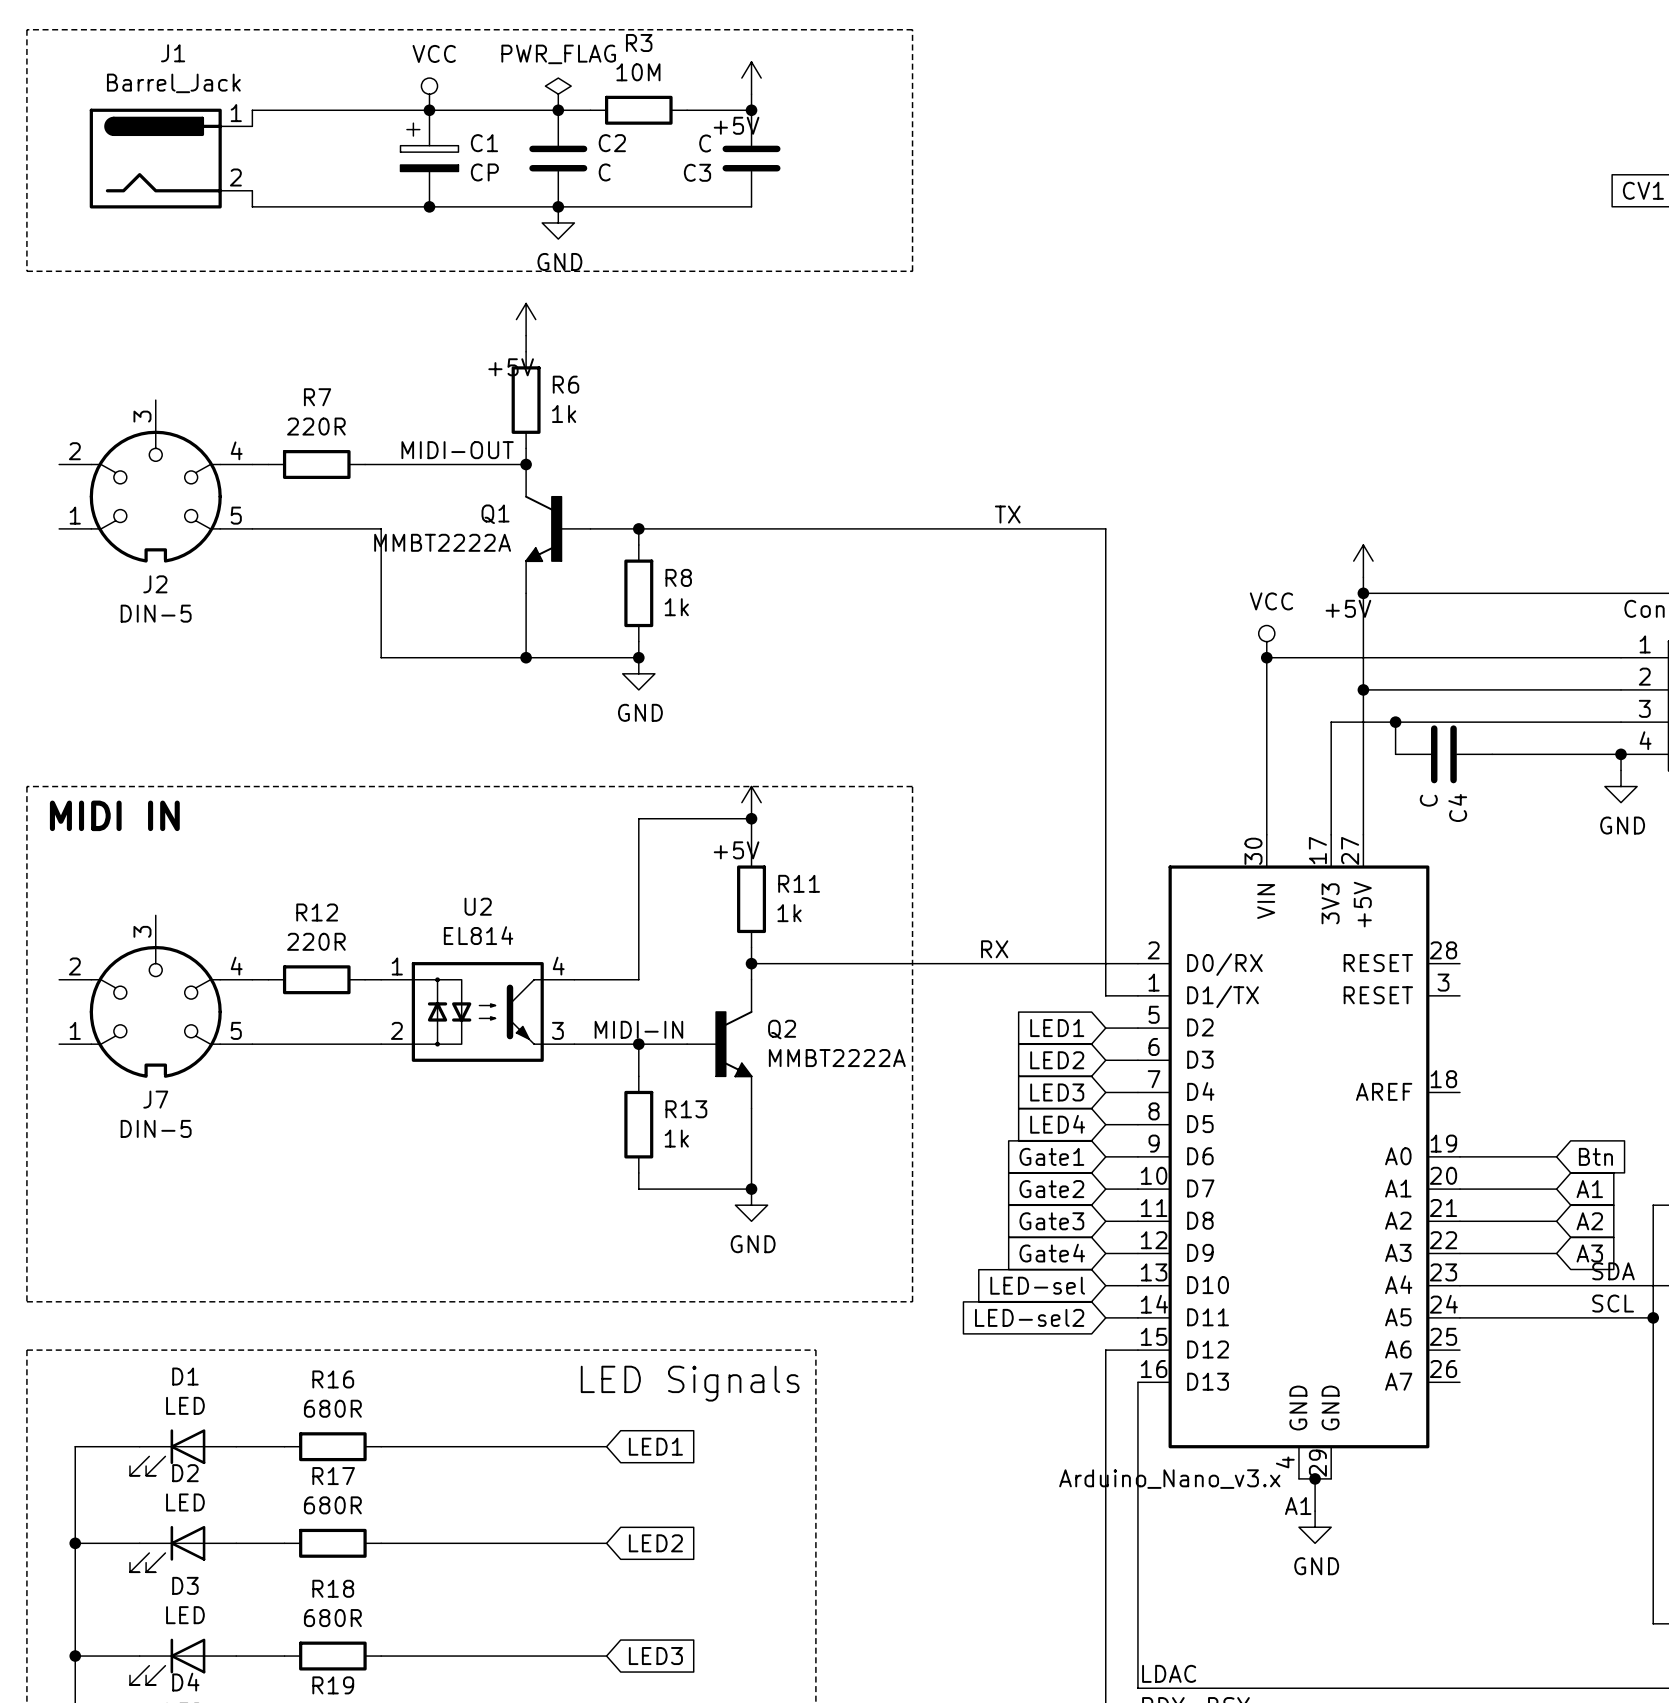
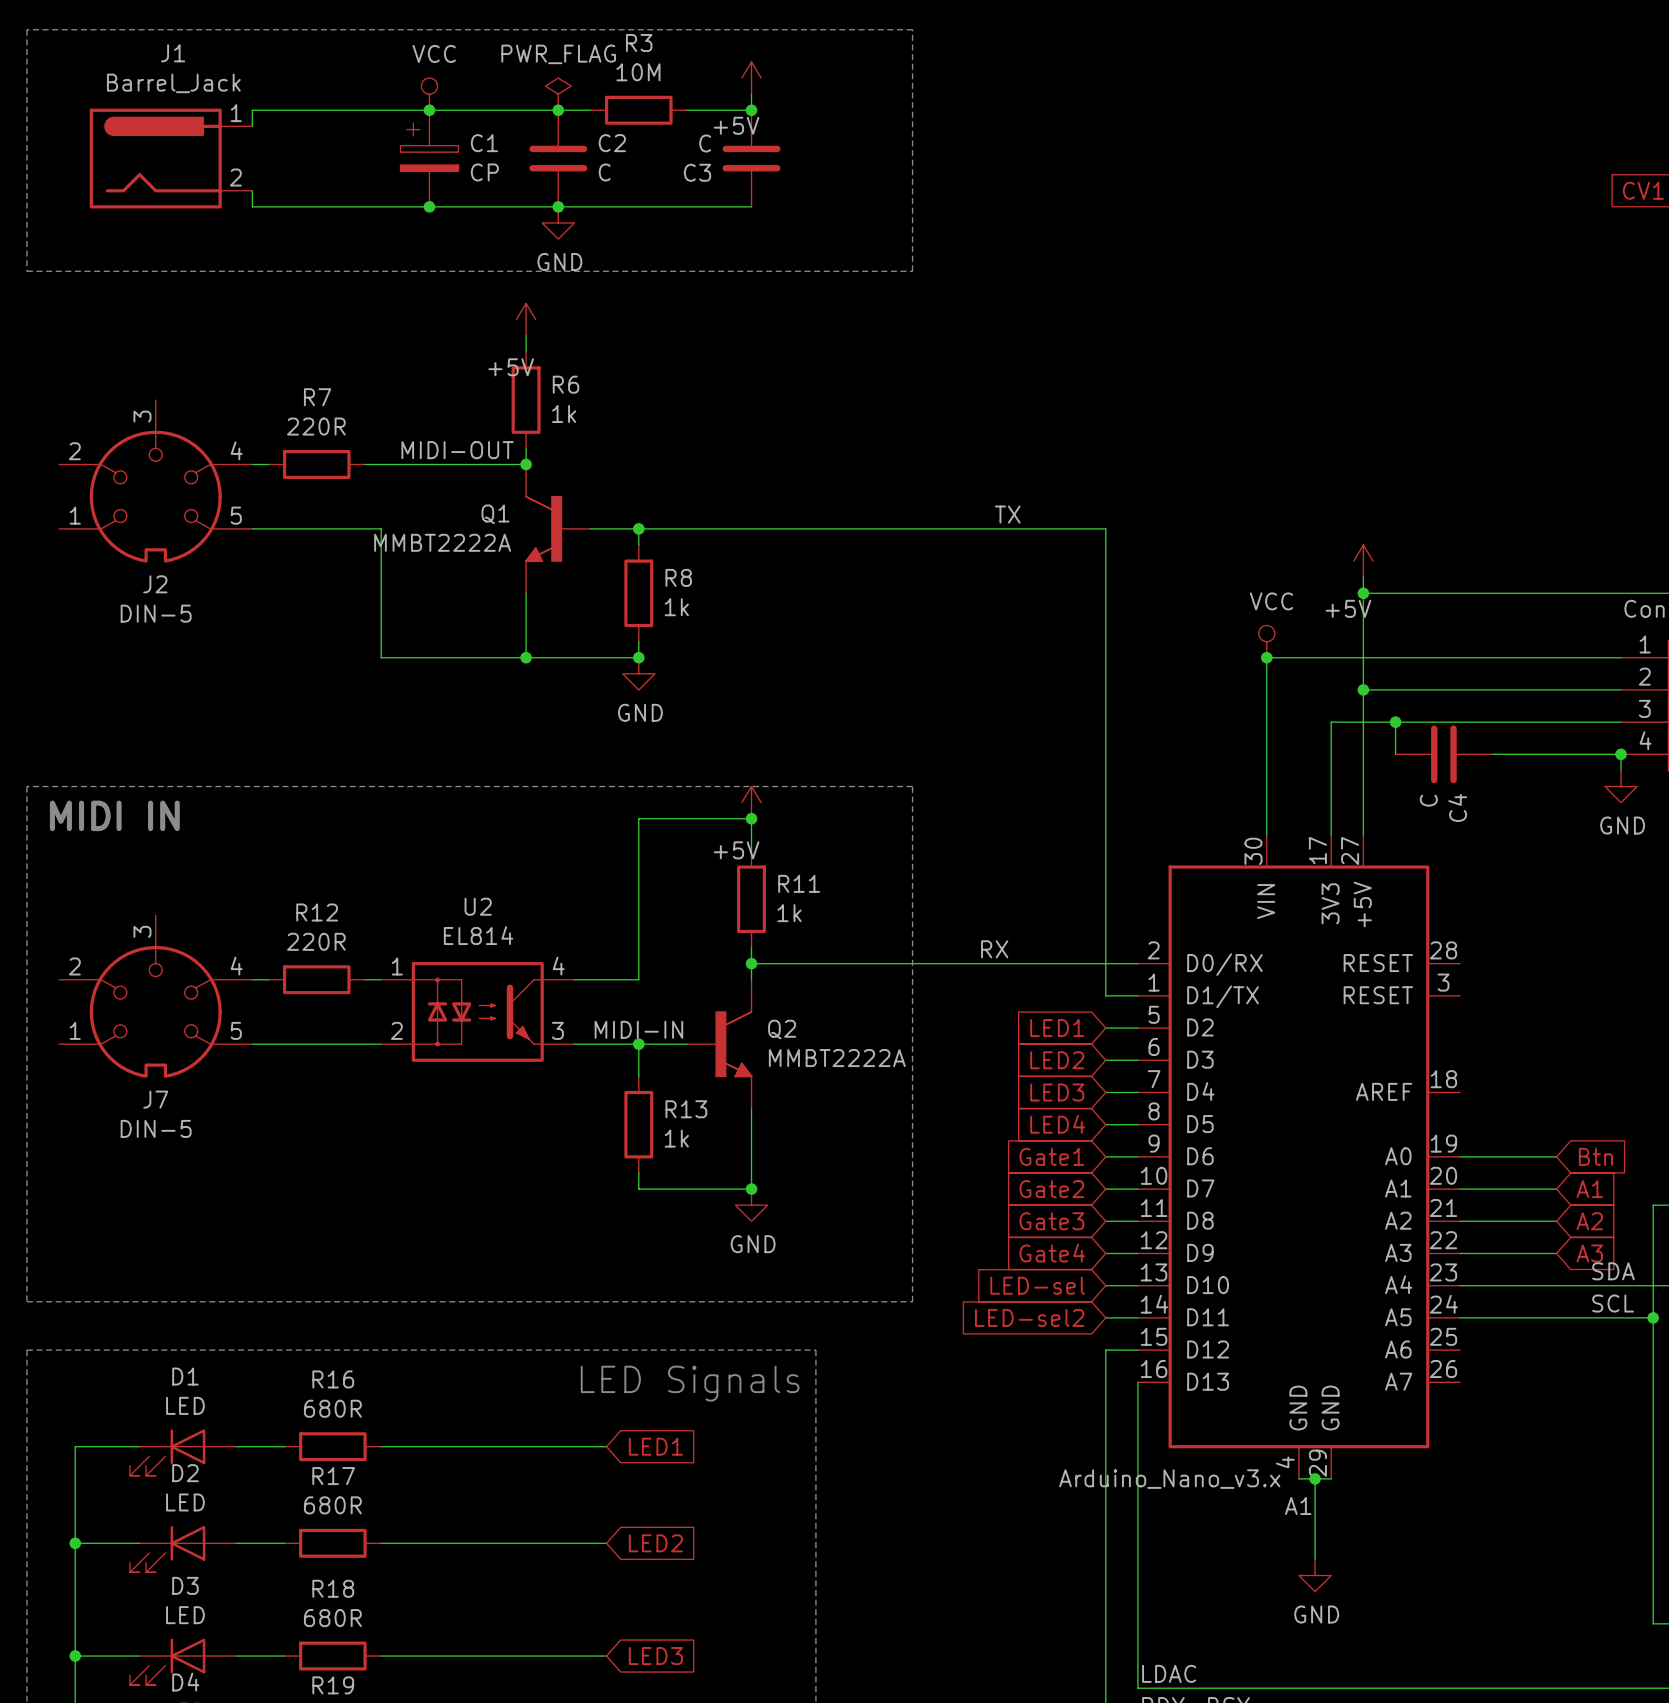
wire: none -> (1315, 1511) (1315, 1559)
power symbol position: GND (1315, 1527) -> GND (1315, 1575)

